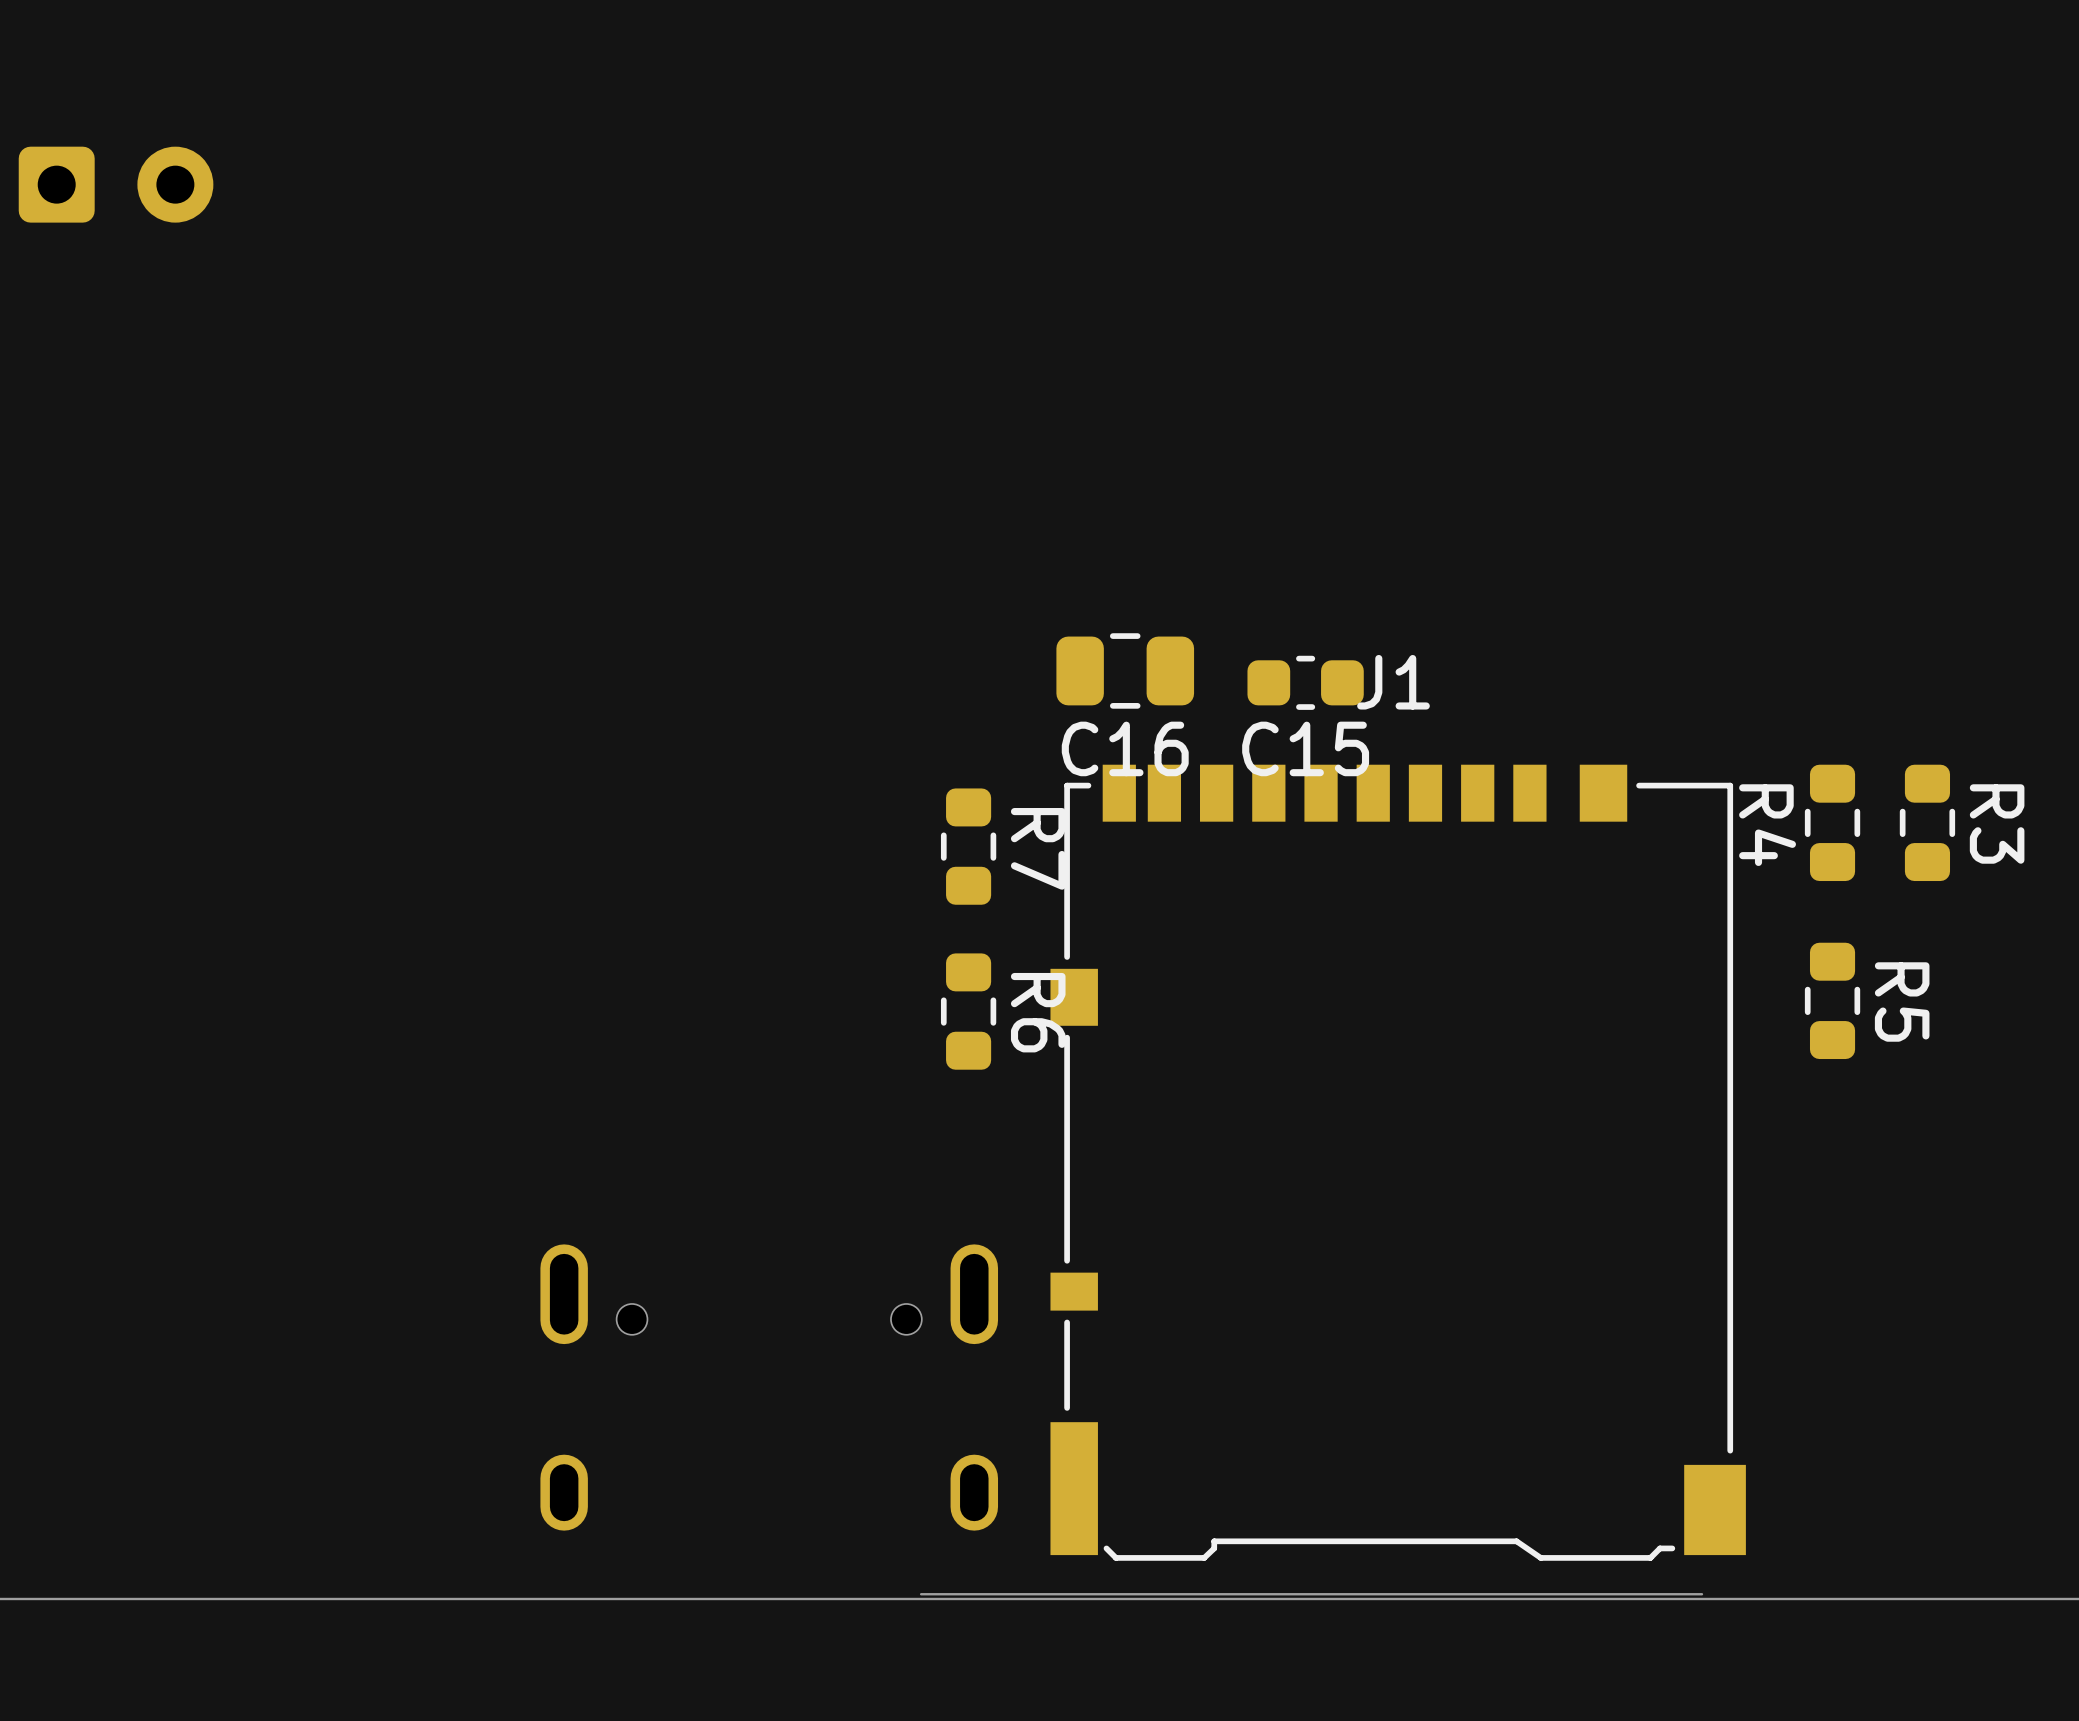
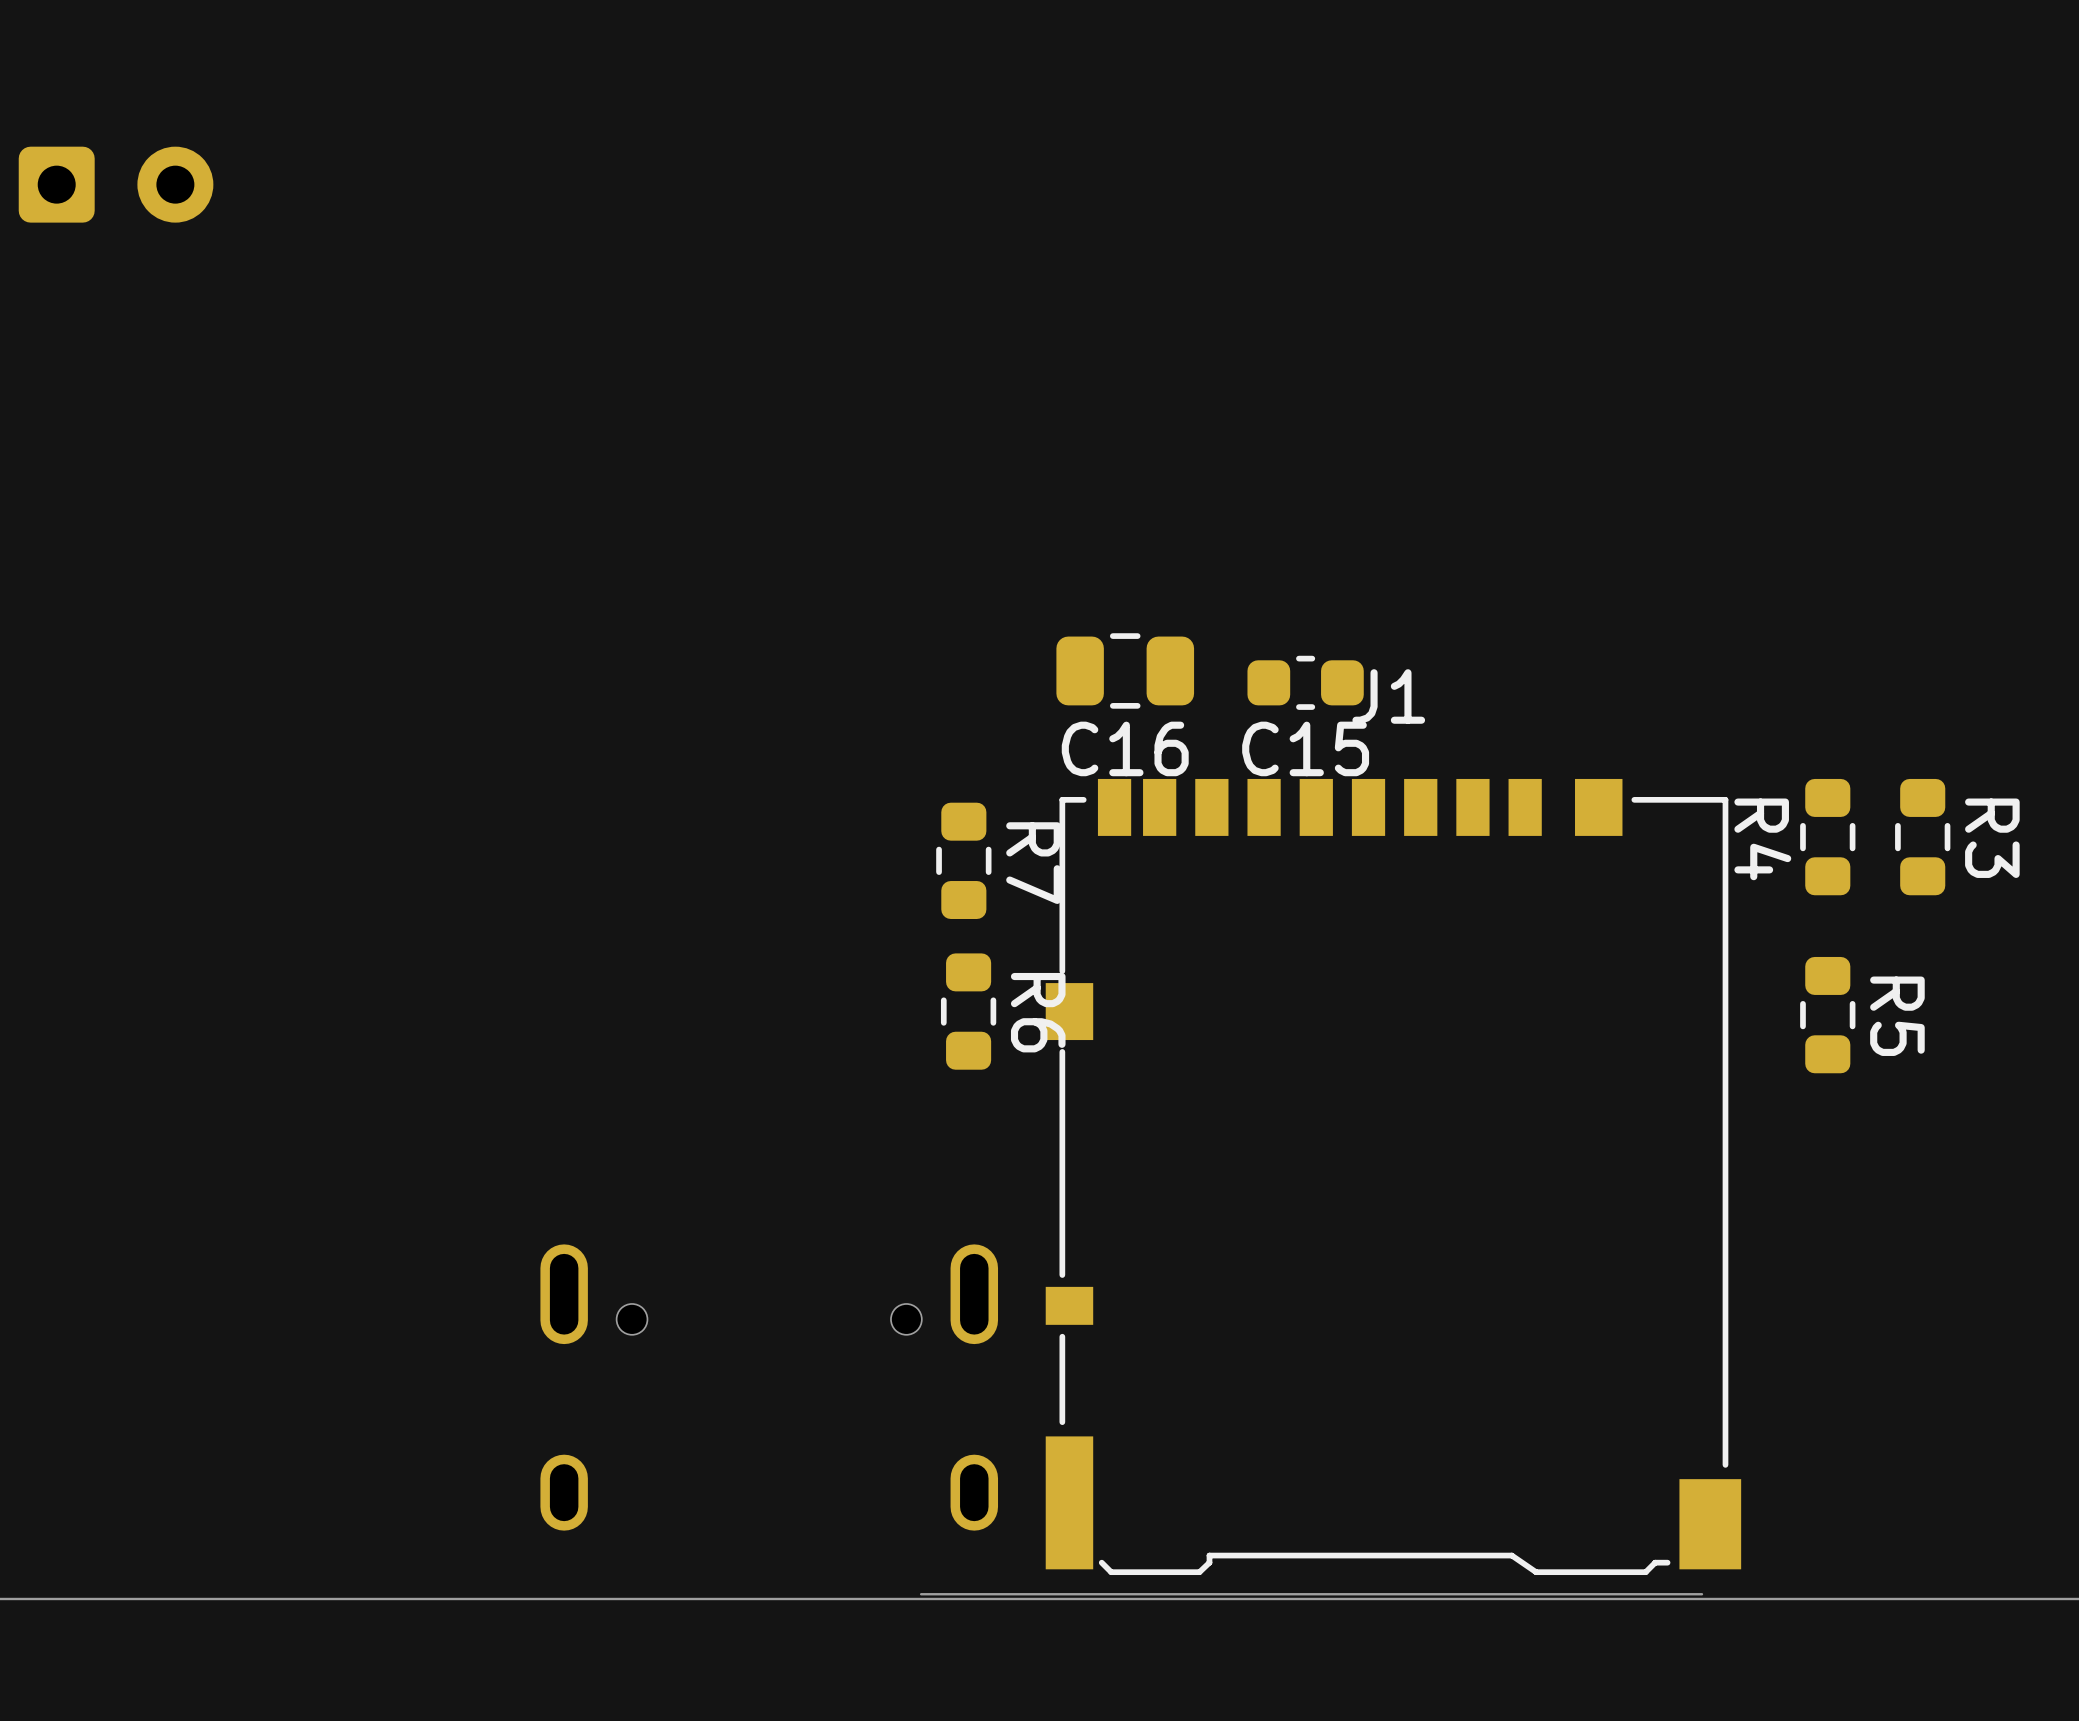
R4 position: (1832, 822) -> (1827, 837)
R3 position: (1927, 822) -> (1922, 837)
R7 position: (968, 846) -> (963, 860)
R5 position: (1832, 1000) -> (1827, 1015)
J1 position: (1398, 1162) -> (1393, 1176)

